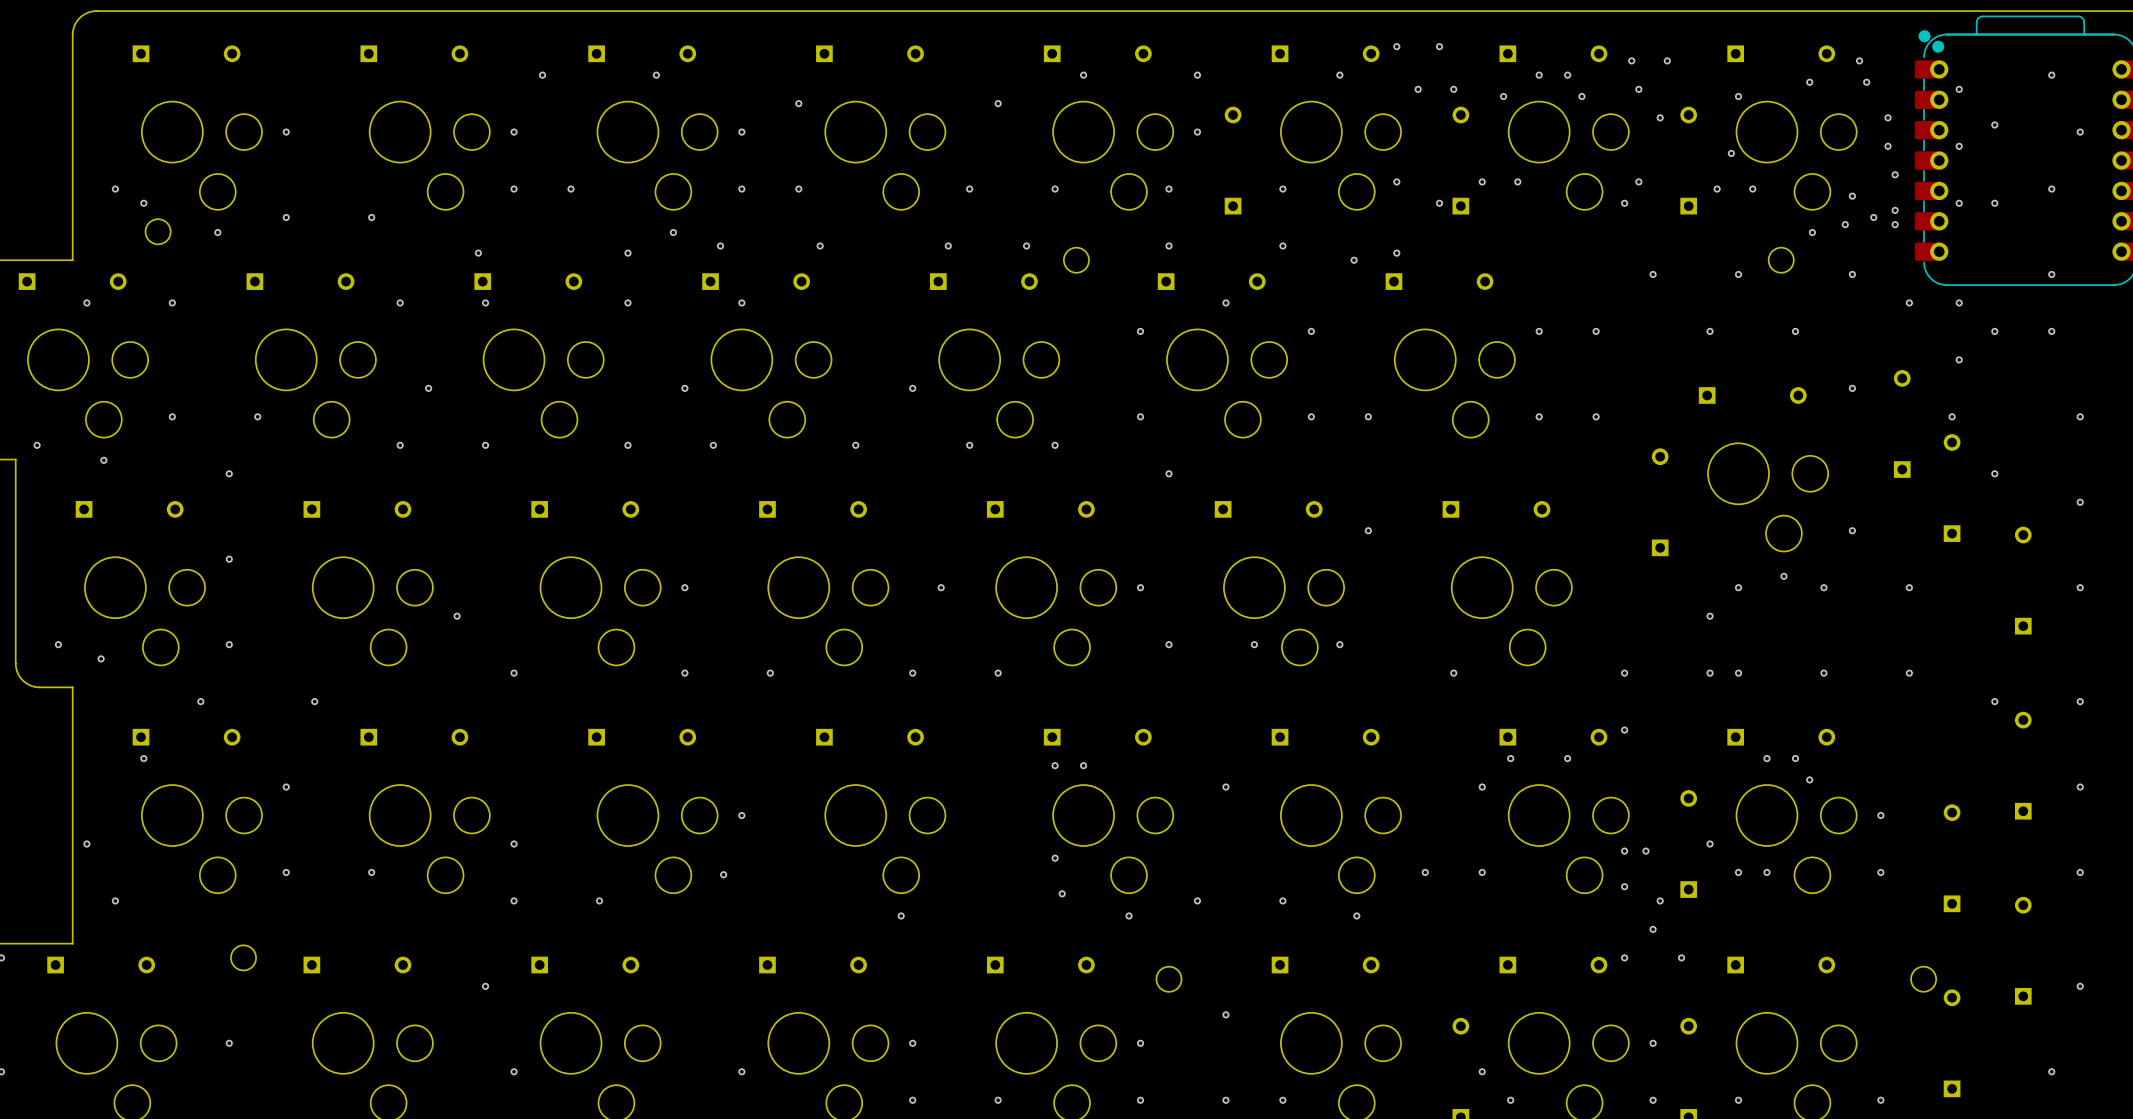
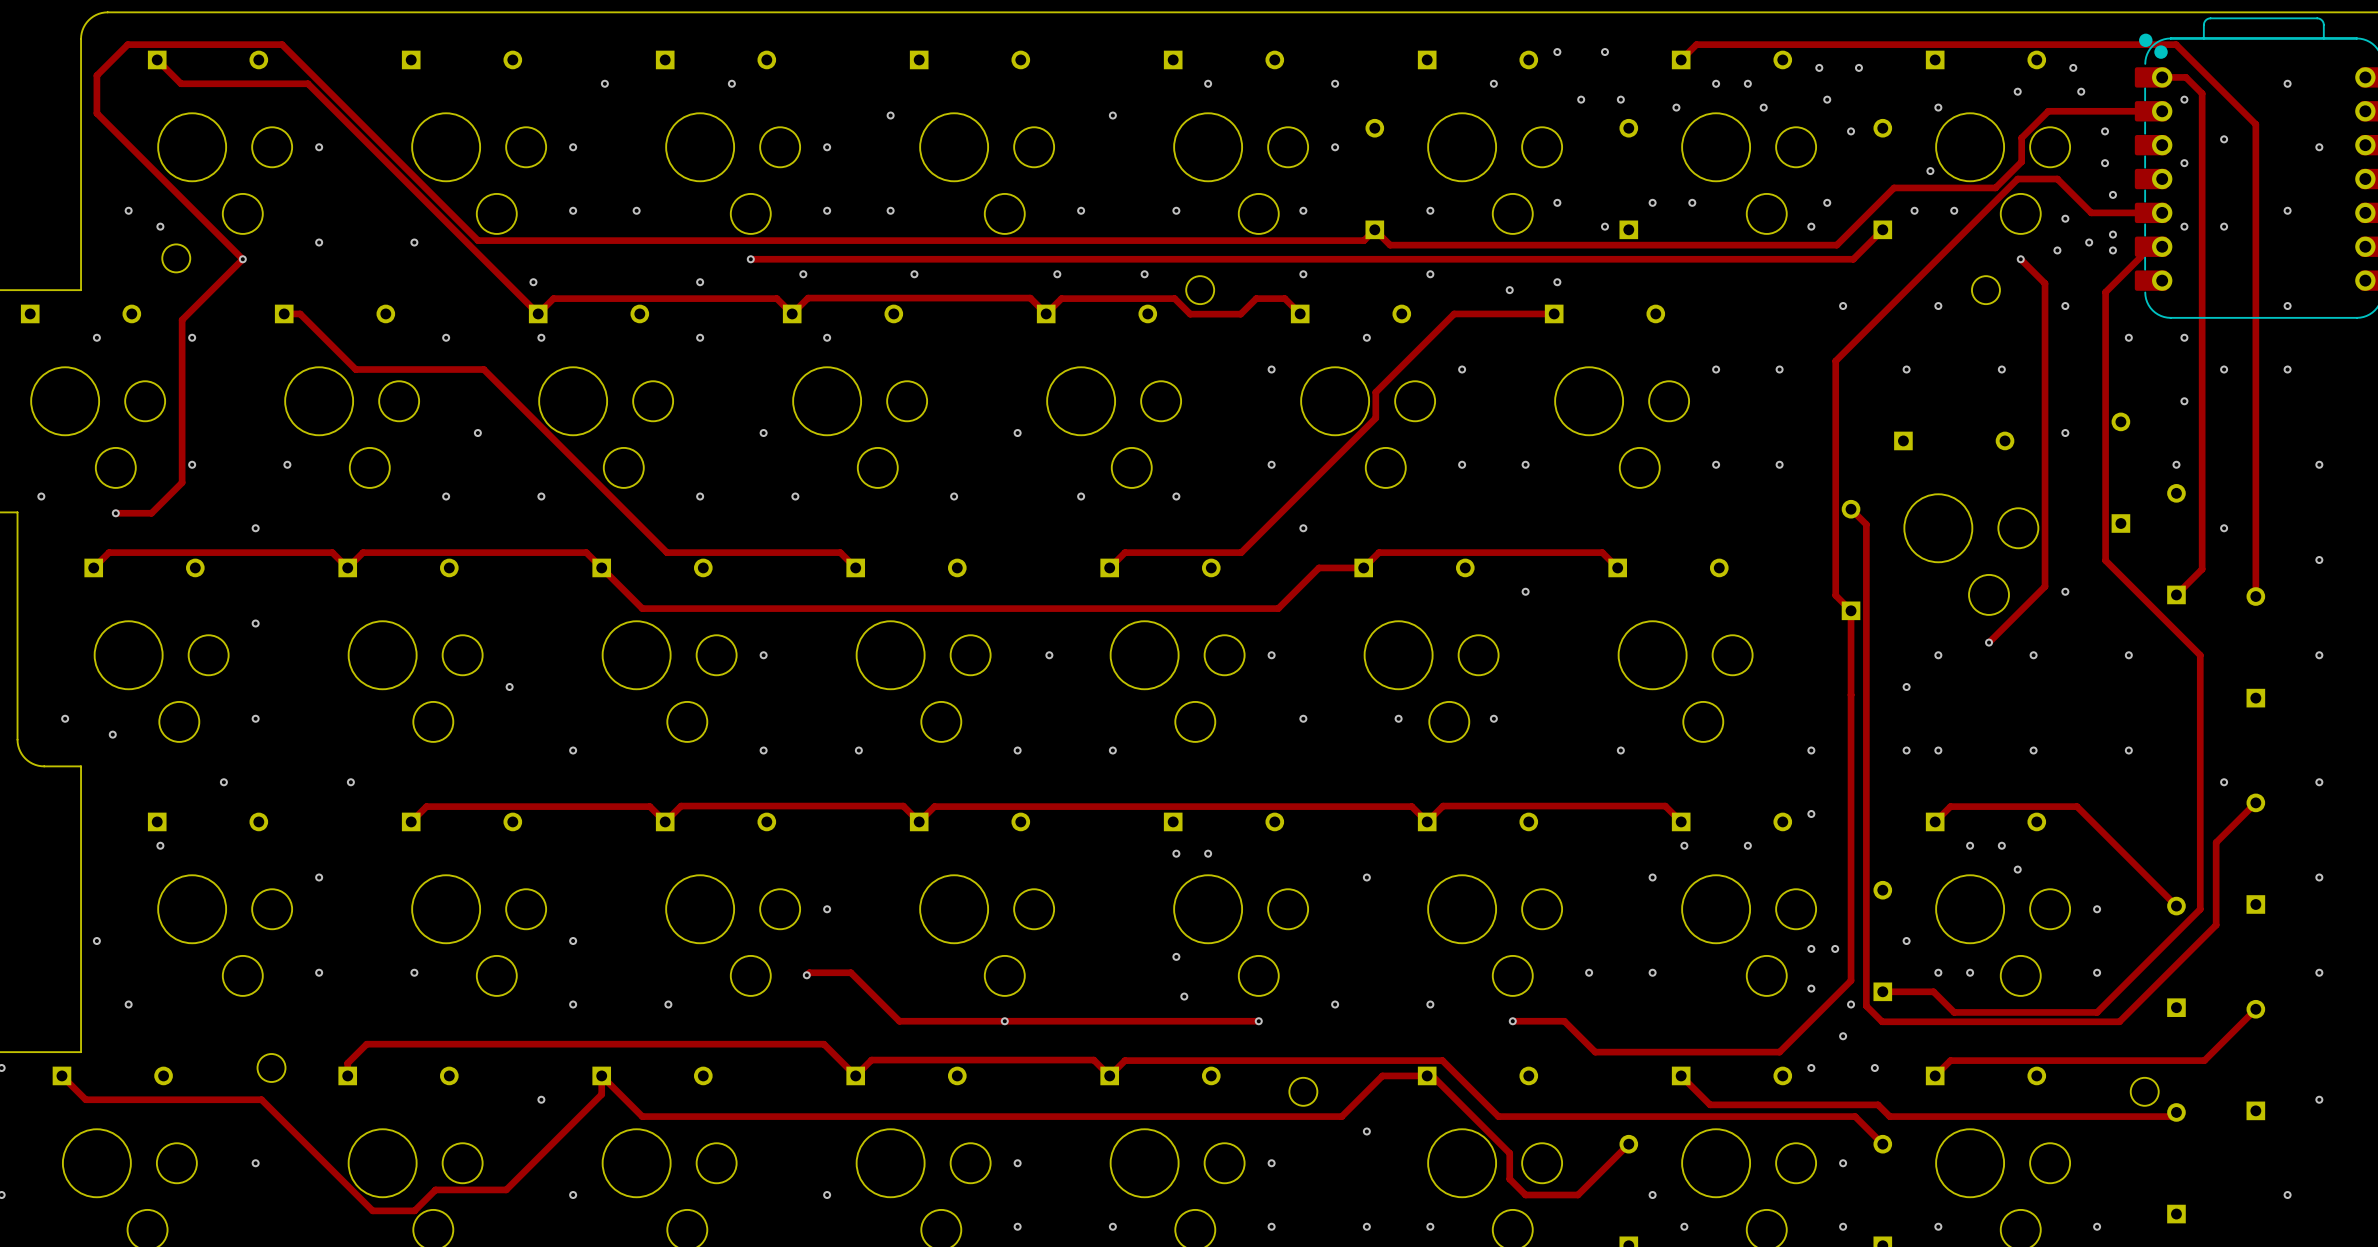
track: none -> (157, 59) (181, 83) (308, 83) (538, 313) (553, 298) (776, 298) (792, 313) (808, 298) (1030, 298) (1046, 313) (1061, 298) (1174, 298) (1190, 314) (1240, 314) (1256, 298) (1284, 298) (1300, 313)
track: none -> (1681, 59) (1696, 44) (2176, 44) (2255, 124) (2255, 596)
track: none -> (2162, 77) (2185, 77) (2202, 93) (2202, 569) (2176, 594)
track: none -> (2151, 111) (2048, 111) (2021, 137) (2021, 161) (1995, 187) (1894, 187) (1836, 245) (1390, 245) (1374, 229) (1364, 240) (478, 240) (282, 44) (127, 44) (96, 75) (96, 113) (242, 259) (182, 319) (182, 482) (151, 513) (115, 513)
track: none -> (2151, 212) (2091, 212) (2057, 179) (2017, 179) (1835, 361) (1835, 595) (1851, 610) (1851, 980) (1779, 1052) (1595, 1052) (1564, 1021) (1512, 1021)
track: none -> (1882, 229) (1853, 259) (750, 259)
track: none -> (2151, 246) (2105, 292) (2105, 560) (2200, 655) (2200, 909) (2097, 1012) (1954, 1012) (1933, 991) (1882, 991)
track: none -> (2020, 259) (2045, 283) (2045, 586) (1989, 642)
track: none -> (284, 313) (300, 313) (355, 369) (483, 369) (666, 552) (840, 552) (855, 567)
track: none -> (1554, 313) (1454, 313) (1375, 392) (1375, 418) (1241, 552) (1125, 552) (1109, 567)
track: none -> (1851, 509) (1866, 524) (1866, 1006) (1882, 1021) (2119, 1021) (2216, 925) (2216, 842) (2255, 802)
track: none -> (93, 567) (109, 552) (332, 552) (347, 567) (363, 552) (586, 552) (642, 608) (1278, 608) (1318, 567) (1363, 567) (1379, 552) (1602, 552) (1617, 567)
track: none -> (411, 821) (426, 806) (649, 806) (665, 821) (681, 806) (903, 806) (919, 821) (934, 806) (1411, 806) (1427, 821) (1443, 806) (1665, 806) (1681, 821)
track: none -> (1935, 821) (1950, 806) (2077, 806) (2176, 906)
track: none -> (806, 975) (809, 972) (850, 972) (899, 1021) (1258, 1021)
track: none -> (2255, 1009) (2204, 1060) (1950, 1060) (1935, 1075)
track: none -> (61, 1075) (85, 1099) (261, 1099) (372, 1210) (414, 1210) (435, 1189) (506, 1189) (601, 1094) (601, 1075) (642, 1116) (1341, 1116) (1382, 1075) (1432, 1075) (1509, 1153) (1509, 1179) (1525, 1194) (1578, 1194) (1628, 1144)
track: none -> (347, 1075) (347, 1063) (366, 1044) (823, 1044) (855, 1075) (871, 1060) (1093, 1060) (1109, 1075) (1125, 1060) (1442, 1060) (1498, 1116) (1855, 1116) (1882, 1144)
track: none -> (1681, 1075) (1710, 1104) (1878, 1104) (1889, 1116) (2172, 1116) (2176, 1112)

